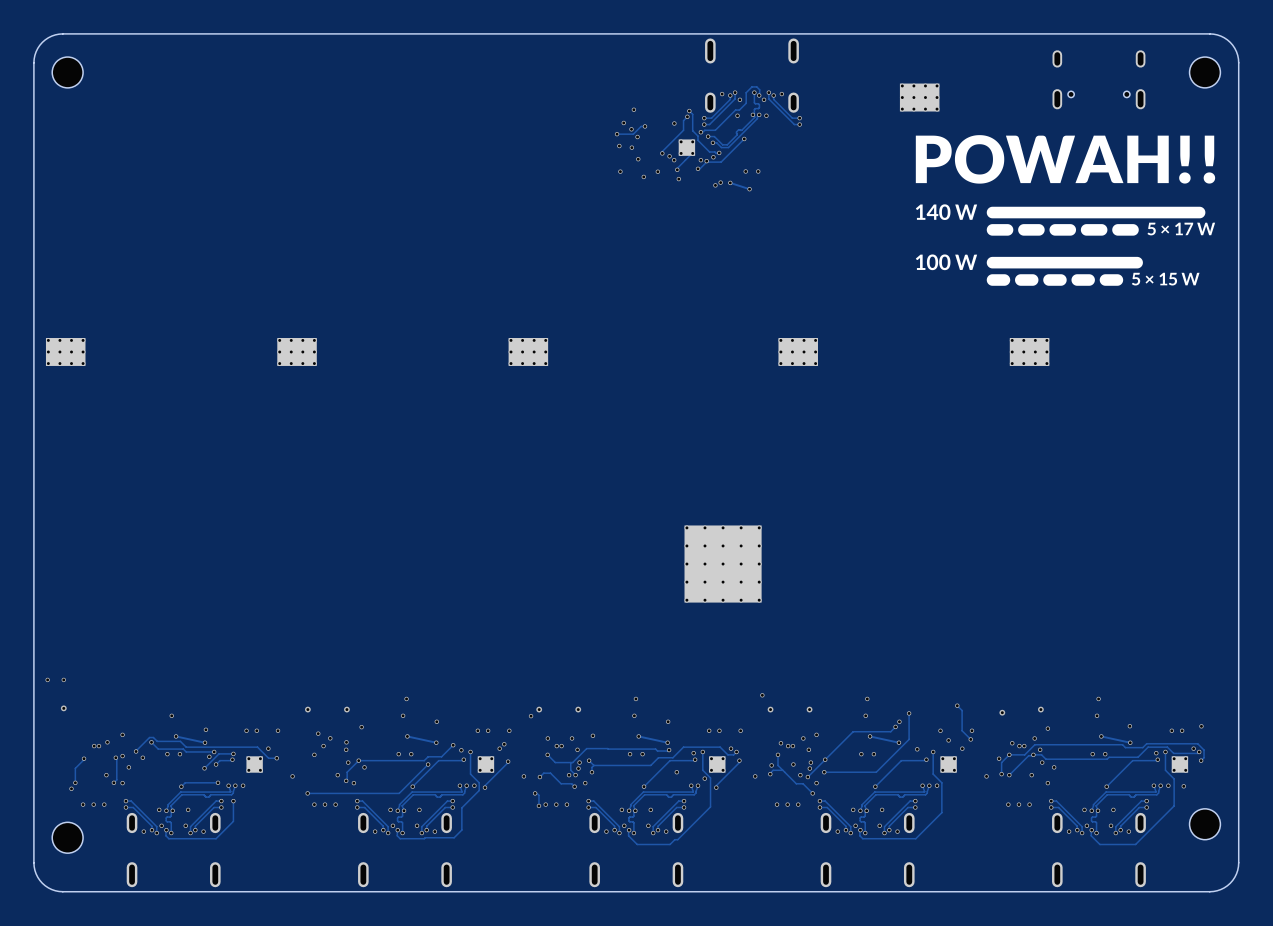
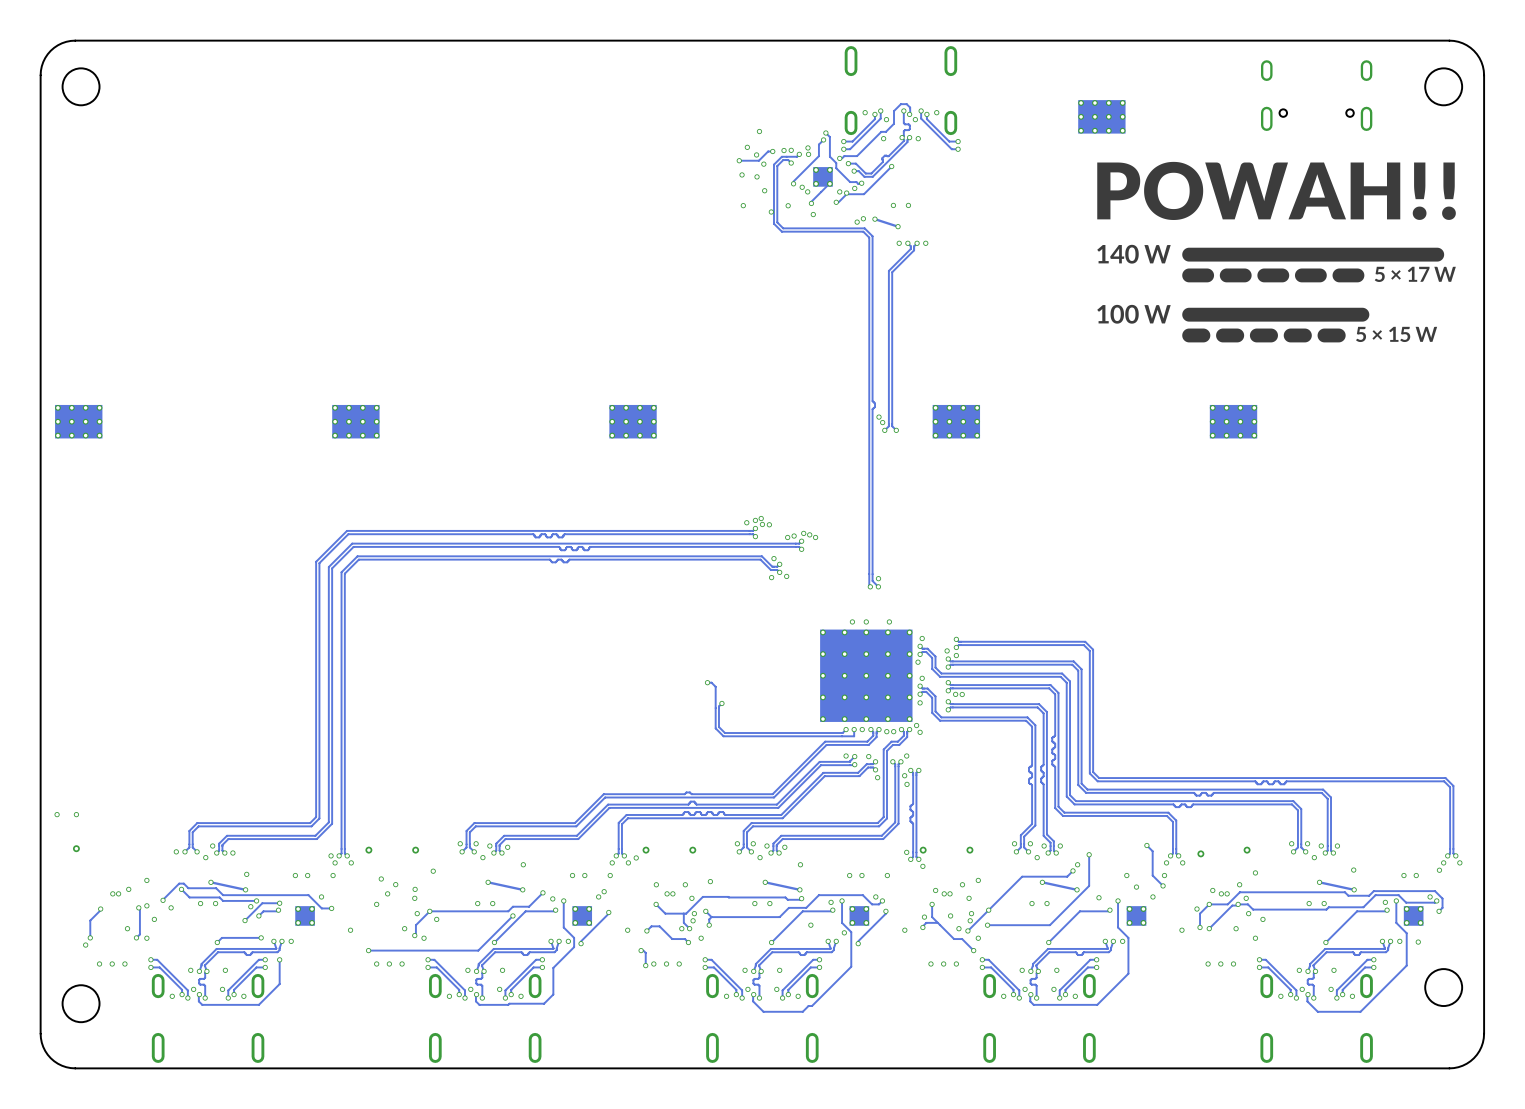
via: none -> (784, 150)
via: none -> (791, 150)
track: none -> (799, 154) (796, 156) (781, 156) (773, 164) (773, 223) (781, 231) (863, 231) (869, 237) (870, 586)
via: none -> (799, 154)
via: none -> (808, 154)
track: none -> (791, 163) (788, 160) (783, 160) (777, 166) (777, 222) (783, 228) (864, 228) (872, 236) (873, 402)
via: none -> (791, 163)
via: none -> (899, 243)
track: none -> (907, 243) (910, 248) (888, 270) (888, 426) (884, 430)
via: none -> (907, 243)
track: none -> (917, 243) (914, 246) (914, 250) (892, 272) (892, 426) (896, 430)
via: none -> (917, 243)
via: none -> (925, 243)
track: none -> (873, 402) (873, 408)
track: none -> (873, 408) (872, 580) (878, 586)
via: none -> (878, 417)
via: none -> (882, 422)
via: none -> (884, 430)
via: none -> (896, 430)
via: none -> (761, 518)
via: none -> (755, 520)
via: none -> (746, 522)
via: none -> (762, 524)
via: none -> (769, 524)
track: none -> (755, 528) (753, 530) (346, 530) (316, 561) (316, 817) (310, 823) (197, 823) (189, 830) (189, 847) (184, 851)
via: none -> (755, 528)
via: none -> (803, 533)
via: none -> (809, 534)
track: none -> (755, 536) (753, 534) (564, 534) (562, 537) (558, 537) (556, 534) (553, 534) (550, 537) (547, 537) (544, 534) (541, 534) (539, 537) (535, 537) (533, 534) (348, 534) (319, 563) (319, 818) (311, 826) (198, 826) (192, 832) (192, 847) (197, 851)
via: none -> (755, 536)
via: none -> (794, 536)
via: none -> (787, 537)
via: none -> (815, 537)
track: none -> (801, 541) (799, 543) (352, 543) (328, 567) (328, 822) (315, 835) (227, 835) (219, 843) (219, 850) (216, 853)
via: none -> (801, 541)
track: none -> (801, 549) (799, 546) (590, 546) (588, 550) (584, 550) (582, 546) (578, 546) (576, 550) (573, 550) (570, 546) (567, 546) (564, 550) (561, 550) (559, 546) (353, 546) (332, 568) (332, 823) (316, 839) (228, 839) (222, 845) (222, 850) (224, 853)
via: none -> (801, 549)
via: none -> (773, 558)
track: none -> (779, 564) (777, 566) (772, 566) (761, 556) (357, 556) (341, 572) (341, 853) (339, 855)
via: none -> (779, 564)
track: none -> (779, 572) (777, 570) (770, 570) (760, 559) (569, 559) (567, 562) (561, 559) (555, 562) (549, 559) (358, 559) (344, 573) (344, 853) (347, 855)
via: none -> (779, 572)
via: none -> (786, 576)
via: none -> (771, 577)
via: none -> (878, 578)
via: none -> (870, 586)
via: none -> (878, 586)
via: none -> (852, 621)
via: none -> (866, 621)
via: none -> (889, 621)
via: none -> (922, 638)
track: none -> (956, 639) (958, 641) (1085, 641) (1093, 649) (1093, 772) (1099, 778) (1445, 778) (1453, 785) (1453, 853) (1455, 855)
via: none -> (956, 639)
track: none -> (920, 646) (922, 648) (927, 648) (935, 656) (935, 667) (941, 673) (1062, 673) (1070, 681) (1070, 795) (1075, 801) (1293, 801) (1301, 809) (1301, 847) (1305, 851)
via: none -> (920, 646)
track: none -> (956, 647) (958, 645) (1083, 645) (1089, 651) (1089, 773) (1097, 781) (1255, 781) (1257, 784) (1261, 784) (1263, 781) (1266, 781) (1269, 784) (1272, 784) (1274, 781) (1278, 781) (1280, 784) (1284, 784) (1286, 781) (1444, 781) (1450, 787) (1450, 853) (1447, 855)
via: none -> (956, 647)
via: none -> (947, 650)
track: none -> (920, 654) (926, 652) (932, 657) (932, 668) (940, 676) (1060, 676) (1066, 682) (1066, 796) (1074, 804) (1173, 804) (1175, 807) (1181, 804) (1187, 807) (1193, 804) (1292, 804) (1297, 810) (1297, 847) (1293, 851)
via: none -> (920, 654)
via: none -> (956, 655)
track: none -> (948, 659) (950, 661) (1073, 661) (1081, 669) (1081, 783) (1087, 789) (1323, 789) (1331, 797) (1331, 850) (1333, 853)
via: none -> (948, 659)
via: none -> (918, 662)
track: none -> (948, 667) (950, 664) (1072, 664) (1078, 670) (1078, 784) (1086, 792) (1194, 792) (1196, 795) (1202, 792) (1208, 795) (1213, 792) (1321, 792) (1327, 798) (1327, 850) (1325, 853)
via: none -> (948, 667)
via: none -> (922, 678)
track: none -> (707, 682) (711, 682) (715, 686) (715, 728) (723, 736) (854, 736) (854, 729)
via: none -> (707, 682)
track: none -> (948, 682) (950, 685) (1050, 685) (1058, 692) (1058, 806) (1064, 812) (1168, 812) (1176, 820) (1176, 853) (1178, 855)
via: none -> (948, 682)
track: none -> (920, 686) (922, 688) (927, 688) (935, 696) (935, 711) (941, 717) (1027, 717) (1035, 725) (1035, 825) (1024, 836) (1024, 847) (1028, 851)
via: none -> (920, 686)
track: none -> (948, 690) (950, 688) (1049, 688) (1055, 694) (1055, 735) (1052, 737) (1052, 741) (1055, 743) (1055, 747) (1052, 749) (1052, 752) (1055, 755) (1055, 758) (1052, 761) (1052, 764) (1055, 766) (1055, 808) (1063, 815) (1167, 815) (1172, 821) (1172, 853) (1170, 855)
via: none -> (948, 690)
track: none -> (920, 694) (926, 691) (932, 697) (932, 712) (940, 720) (1026, 720) (1032, 726) (1032, 765) (1029, 767) (1029, 771) (1032, 773) (1032, 777) (1029, 779) (1029, 782) (1032, 785) (1032, 824) (1020, 835) (1020, 847) (1016, 851)
via: none -> (920, 694)
via: none -> (955, 694)
via: none -> (962, 694)
track: none -> (948, 701) (950, 704) (1039, 704) (1046, 712) (1046, 834) (1053, 841) (1053, 850) (1056, 853)
via: none -> (948, 701)
via: none -> (920, 702)
track: none -> (721, 703) (718, 706) (718, 727) (724, 733) (842, 733) (846, 729)
via: none -> (721, 703)
track: none -> (948, 709) (950, 707) (1037, 707) (1043, 713) (1042, 765)
via: none -> (948, 709)
via: none -> (916, 725)
via: none -> (846, 729)
via: none -> (854, 729)
via: none -> (862, 729)
track: none -> (870, 729) (873, 735) (867, 741) (825, 741) (772, 794) (691, 794) (689, 792) (684, 794) (603, 794) (574, 823) (474, 823) (466, 830) (466, 847) (462, 851)
via: none -> (870, 729)
track: none -> (878, 729) (876, 731) (876, 737) (868, 744) (826, 744) (774, 797) (605, 797) (576, 826) (475, 826) (469, 832) (469, 847) (474, 851)
via: none -> (878, 729)
track: none -> (901, 729) (903, 735) (897, 741) (891, 741) (883, 749) (883, 817) (877, 823) (751, 823) (743, 830) (743, 847) (739, 851)
via: none -> (901, 729)
track: none -> (909, 729) (907, 731) (907, 737) (899, 744) (892, 744) (887, 750) (887, 818) (879, 826) (752, 826) (746, 832) (746, 847) (751, 851)
via: none -> (909, 729)
via: none -> (886, 731)
via: none -> (893, 731)
via: none -> (920, 732)
via: none -> (846, 756)
track: none -> (854, 756) (850, 761) (819, 761) (776, 804) (696, 804) (694, 801) (690, 801) (688, 804) (608, 804) (576, 835) (504, 835) (496, 843) (496, 850) (493, 853)
via: none -> (854, 756)
via: none -> (868, 756)
via: none -> (906, 756)
track: none -> (875, 761) (873, 764) (866, 764) (858, 772) (823, 772) (781, 814) (725, 814) (722, 812) (719, 812) (717, 814) (713, 814) (711, 812) (707, 812) (705, 814) (702, 814) (699, 812) (696, 812) (694, 814) (690, 814) (688, 812) (684, 812) (682, 814) (626, 814) (618, 822) (618, 853) (616, 855)
via: none -> (875, 761)
track: none -> (892, 761) (895, 764) (895, 822) (881, 835) (781, 835) (773, 843) (773, 850) (771, 853)
via: none -> (892, 761)
track: none -> (900, 761) (898, 764) (898, 823) (883, 839) (782, 839) (776, 845) (776, 850) (779, 853)
via: none -> (900, 761)
track: none -> (854, 764) (821, 765) (778, 807) (609, 807) (578, 839) (505, 839) (499, 845) (499, 850) (501, 853)
via: none -> (854, 764)
track: none -> (1042, 765) (1042, 771)
track: none -> (875, 769) (873, 767) (868, 767) (859, 776) (824, 776) (782, 818) (627, 818) (621, 824) (621, 853) (624, 855)
via: none -> (875, 769)
track: none -> (910, 770) (913, 772) (913, 803) (910, 806) (913, 812) (910, 817) (913, 823) (913, 856) (910, 859)
via: none -> (910, 770)
track: none -> (918, 770) (916, 772) (916, 856) (918, 859)
via: none -> (918, 770)
track: none -> (1042, 771) (1042, 777)
via: none -> (904, 775)
track: none -> (1042, 777) (1042, 783)
via: none -> (877, 777)
track: none -> (1042, 783) (1043, 835) (1050, 842) (1050, 850) (1048, 853)
via: none -> (907, 784)
via: (762, 695) -> none
via: (406, 698) -> none
via: (635, 698) -> none
via: (867, 698) -> none
via: (1098, 698) -> none
via: none -> (460, 843)
via: none -> (476, 843)
via: none -> (737, 843)
via: none -> (753, 843)
via: none -> (1014, 843)
via: none -> (1030, 843)
via: none -> (1291, 843)
via: none -> (1307, 843)
via: none -> (212, 846)
via: none -> (489, 846)
via: none -> (766, 846)
via: none -> (1044, 846)
via: none -> (1060, 846)
via: none -> (1321, 846)
via: none -> (1337, 846)
via: none -> (507, 847)
via: none -> (784, 847)
via: none -> (176, 851)
via: none -> (184, 851)
via: none -> (197, 851)
via: none -> (216, 853)
via: none -> (224, 853)
via: none -> (232, 853)
via: none -> (462, 851)
via: none -> (474, 851)
via: none -> (493, 853)
via: none -> (501, 853)
via: none -> (739, 851)
via: none -> (751, 851)
via: none -> (771, 853)
via: none -> (779, 853)
via: none -> (906, 852)
via: none -> (1016, 851)
via: none -> (1028, 851)
via: none -> (1048, 853)
via: none -> (1056, 853)
via: none -> (1293, 851)
via: none -> (1305, 851)
via: none -> (1325, 853)
via: none -> (1333, 853)
via: none -> (331, 855)
via: none -> (339, 855)
via: none -> (347, 855)
via: none -> (616, 855)
via: none -> (624, 855)
via: none -> (1170, 855)
via: none -> (1178, 855)
via: none -> (1447, 855)
via: none -> (1455, 855)
via: none -> (910, 859)
via: none -> (918, 859)
via: none -> (335, 862)
via: none -> (351, 862)
via: none -> (612, 862)
via: none -> (628, 862)
via: none -> (1166, 862)
via: none -> (1182, 862)
via: none -> (1443, 862)
via: none -> (1459, 862)
via: none -> (922, 866)

